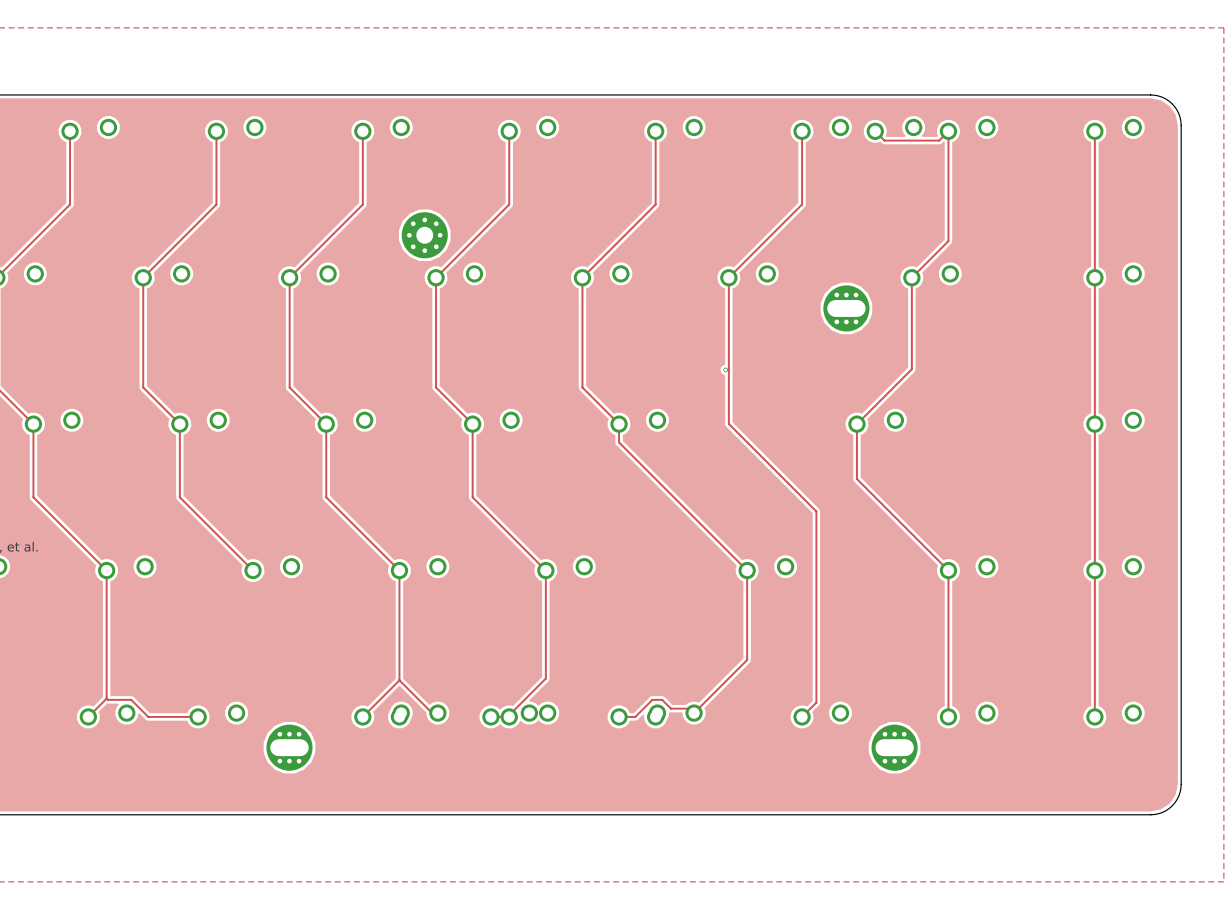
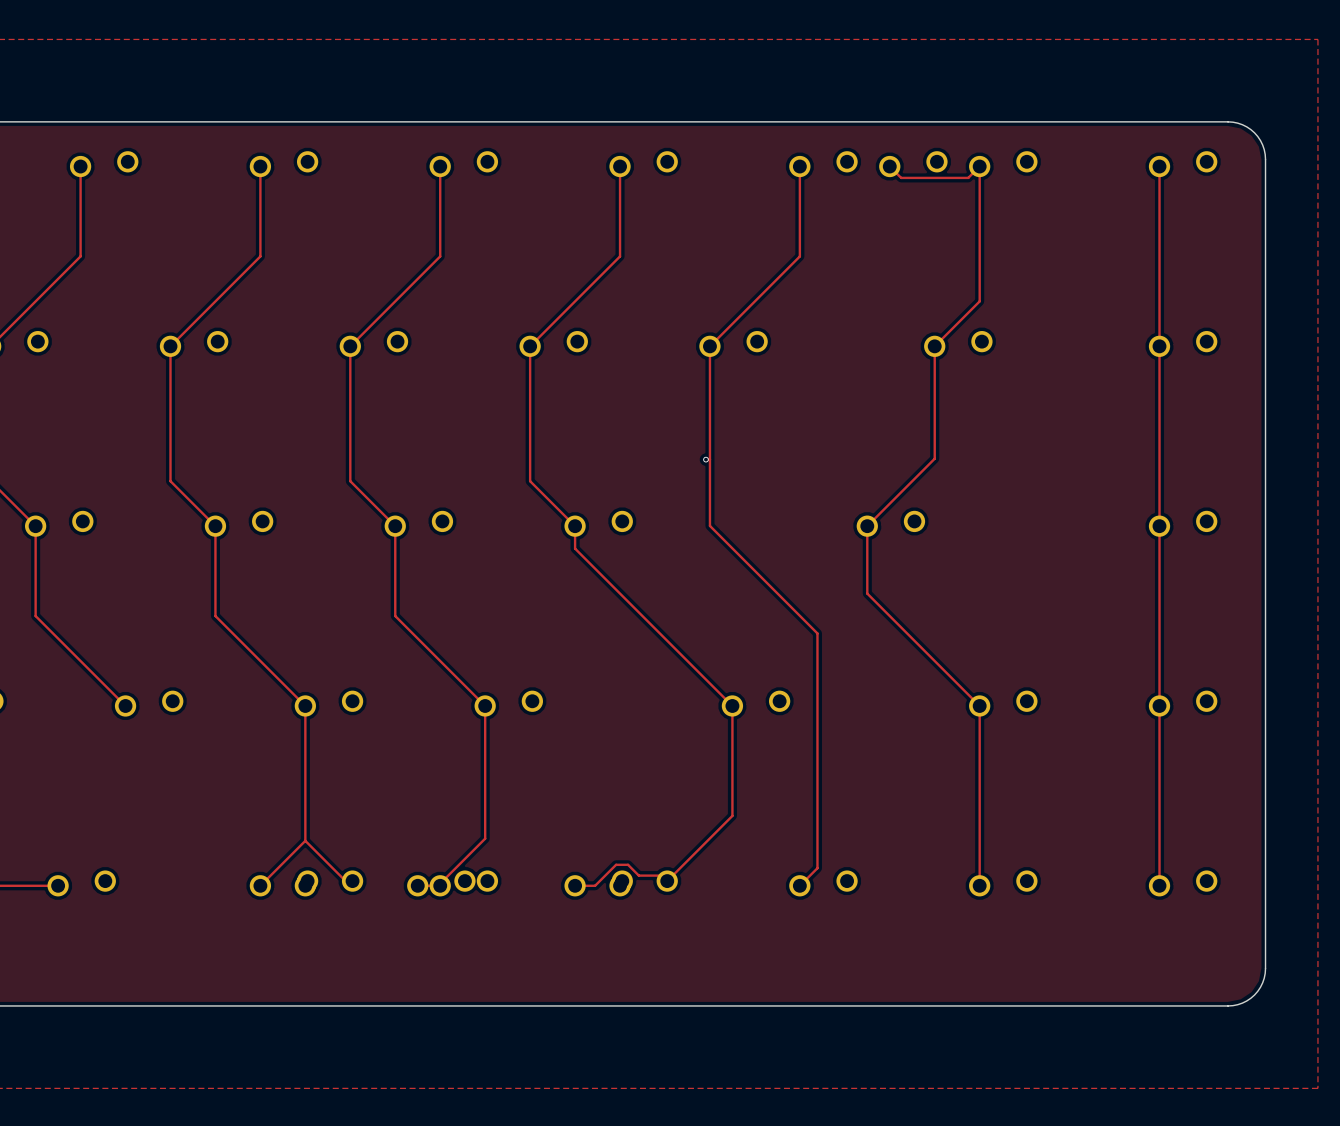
part: (424, 235) -> none
part: (846, 308) -> none
part: (289, 747) -> none
part: (894, 747) -> none

